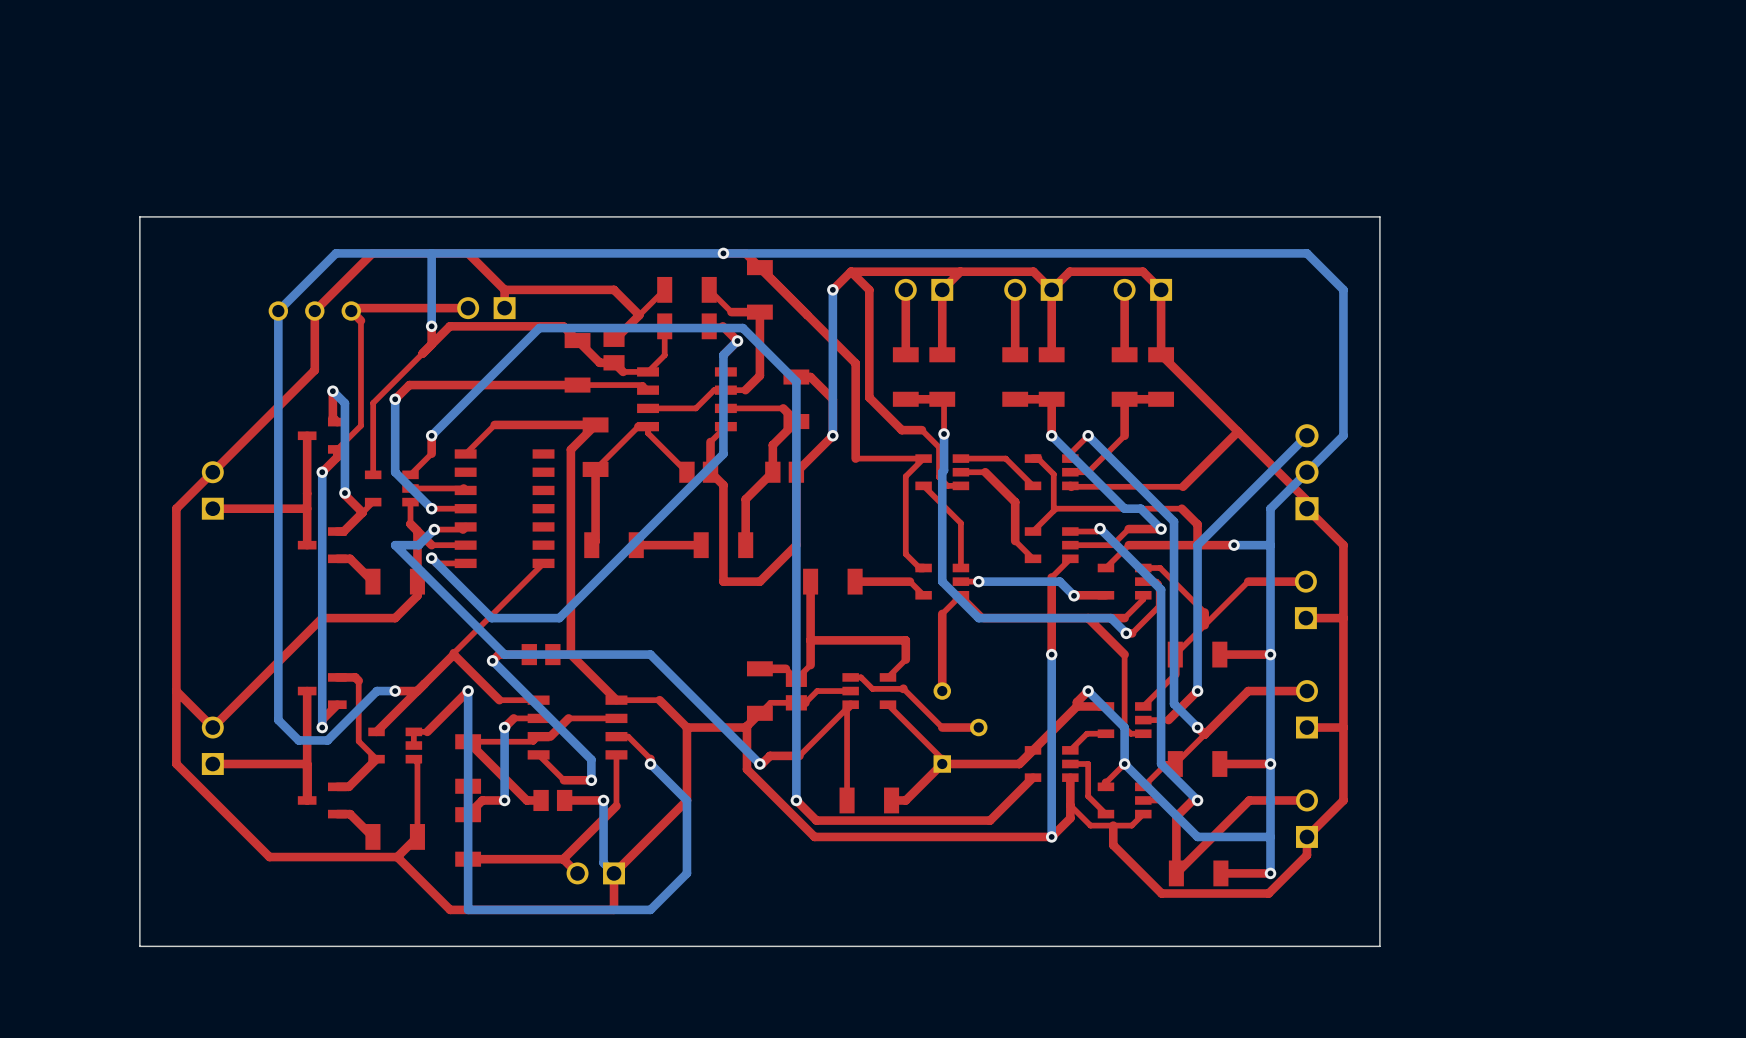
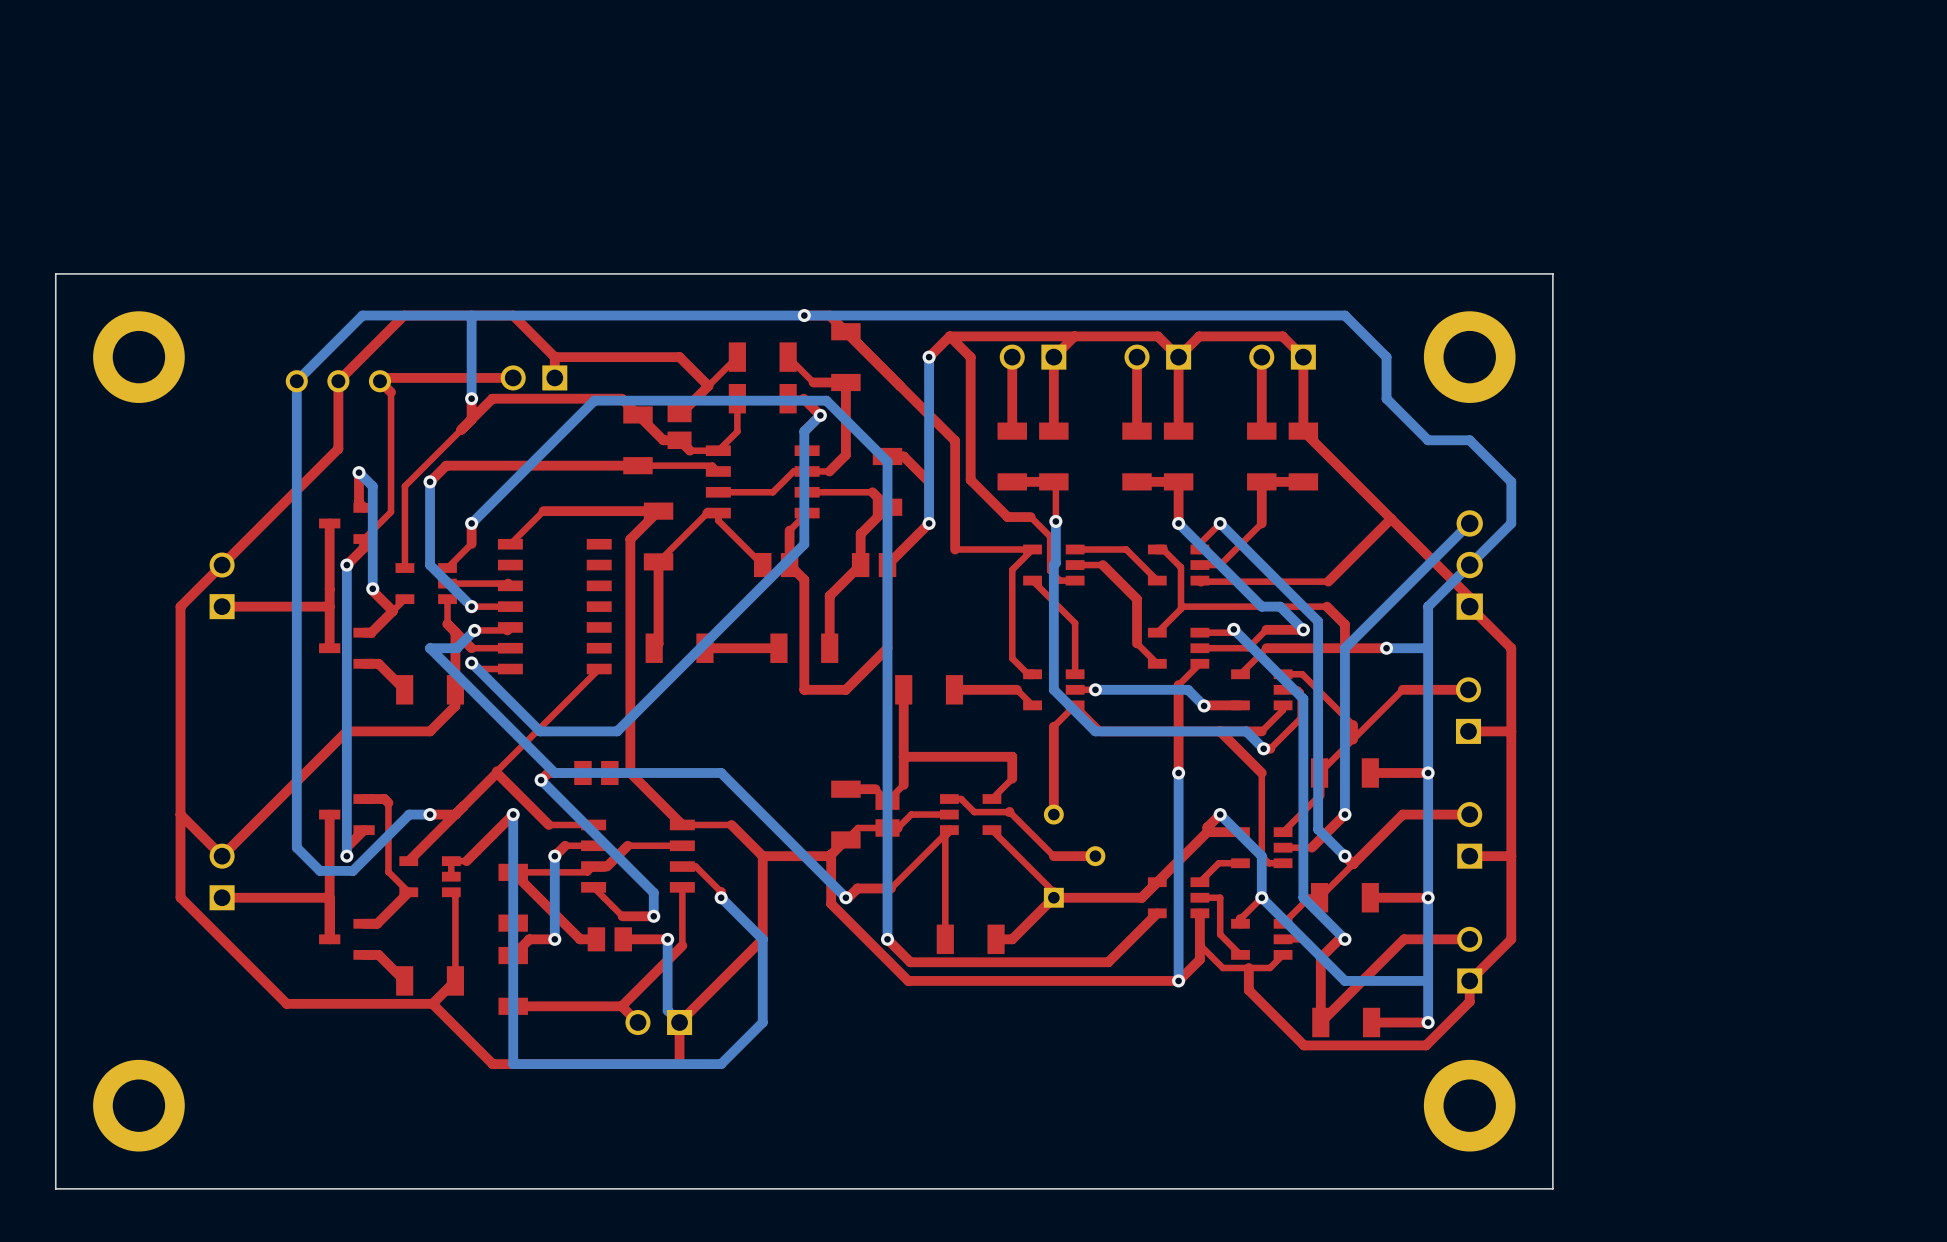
board edge: (139, 216) (139, 946) (1379, 946) -> (138, 273) (55, 273) (55, 1188) (1552, 1188) (1552, 1105)
bottom track: (1197, 253) (1306, 253) (1343, 289) (1343, 399) -> (1344, 315) (1386, 357) (1386, 398) (1428, 440) (1469, 440) (1511, 481)
part: none -> (138, 357)
part: none -> (1469, 357)
part: none -> (138, 1105)
part: none -> (1469, 1105)

